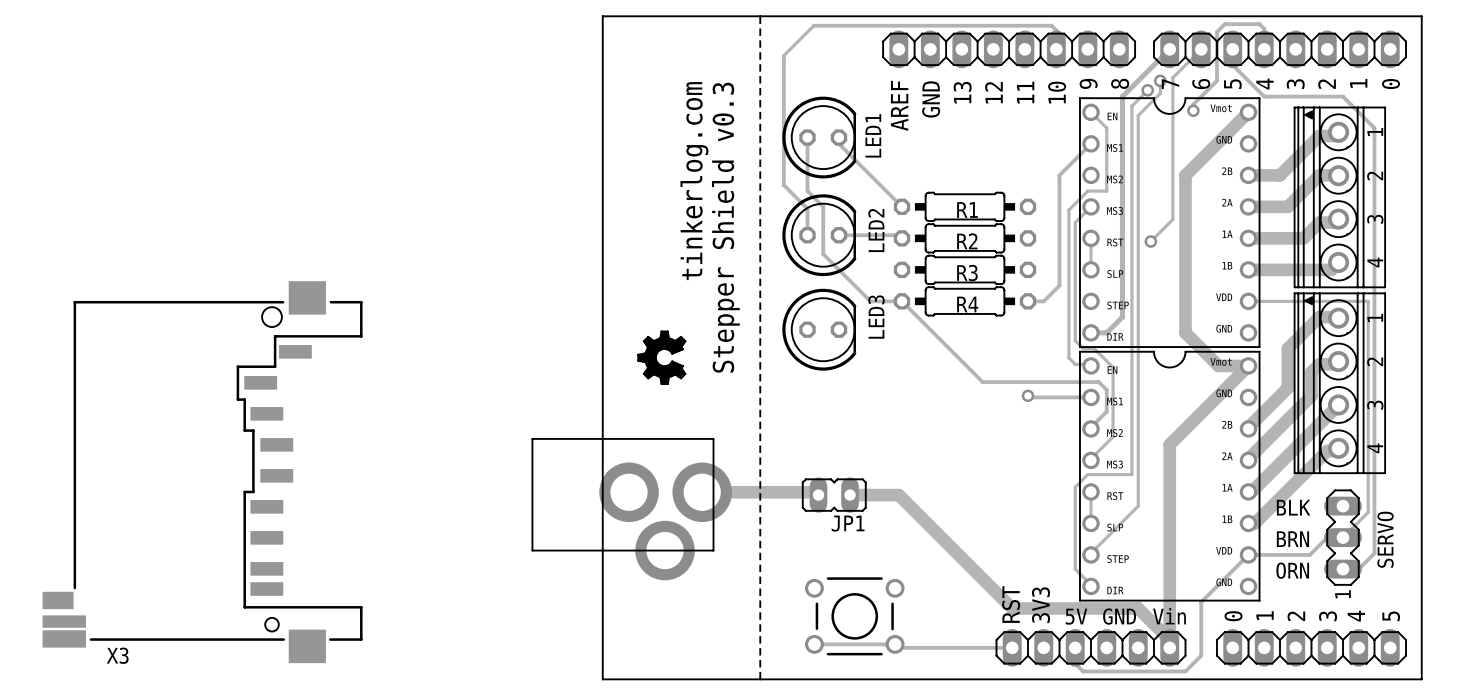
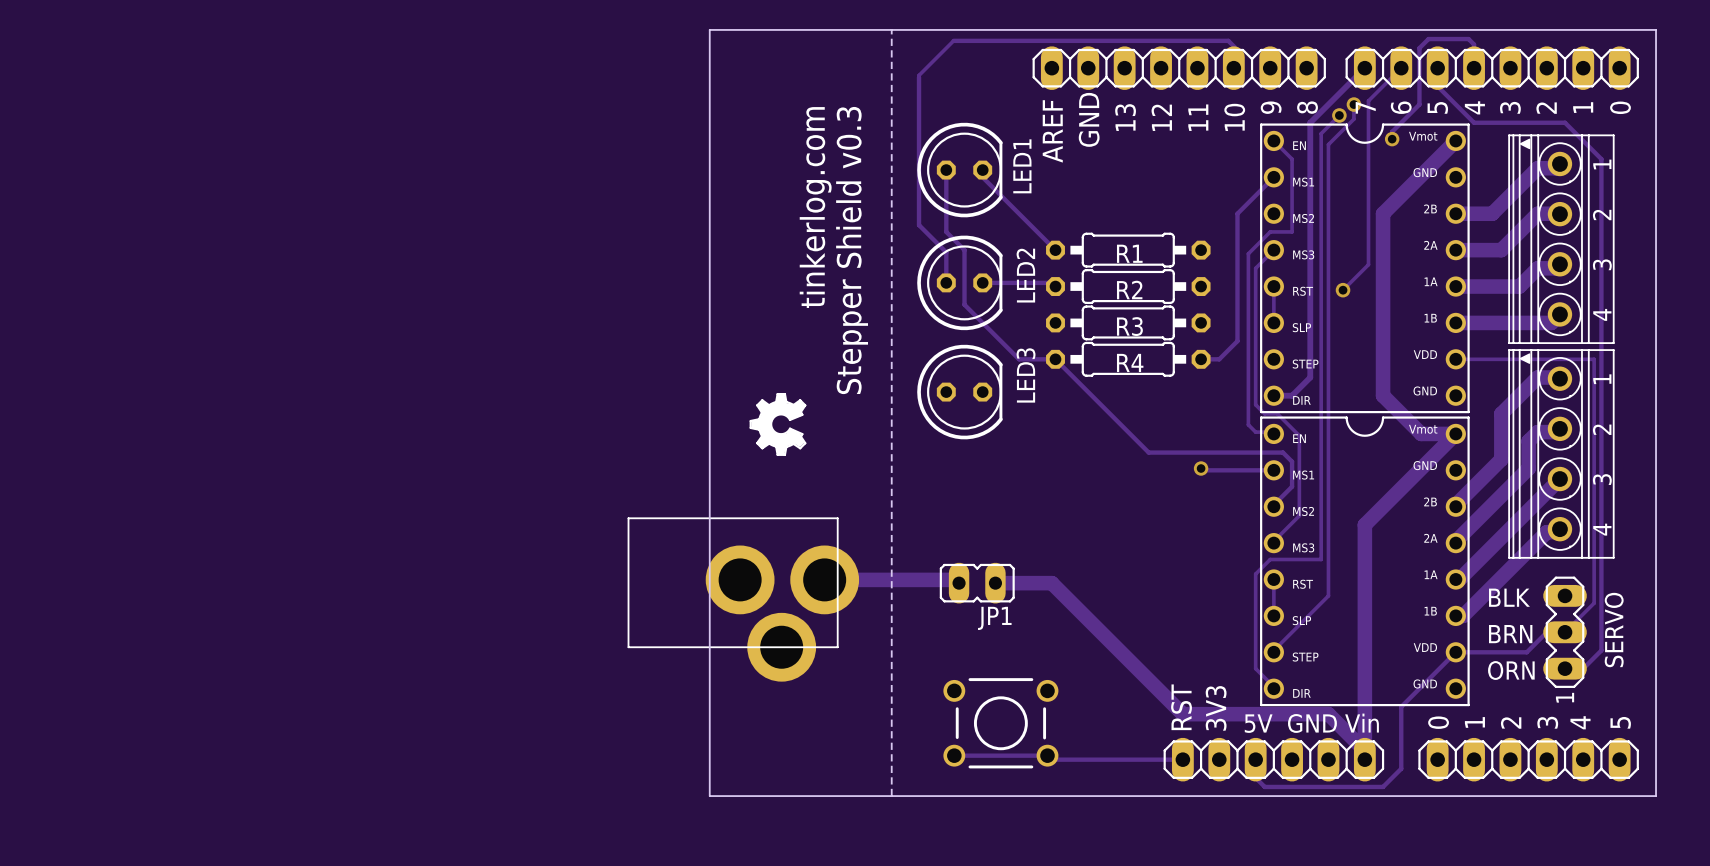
X3: (202, 472) -> none

